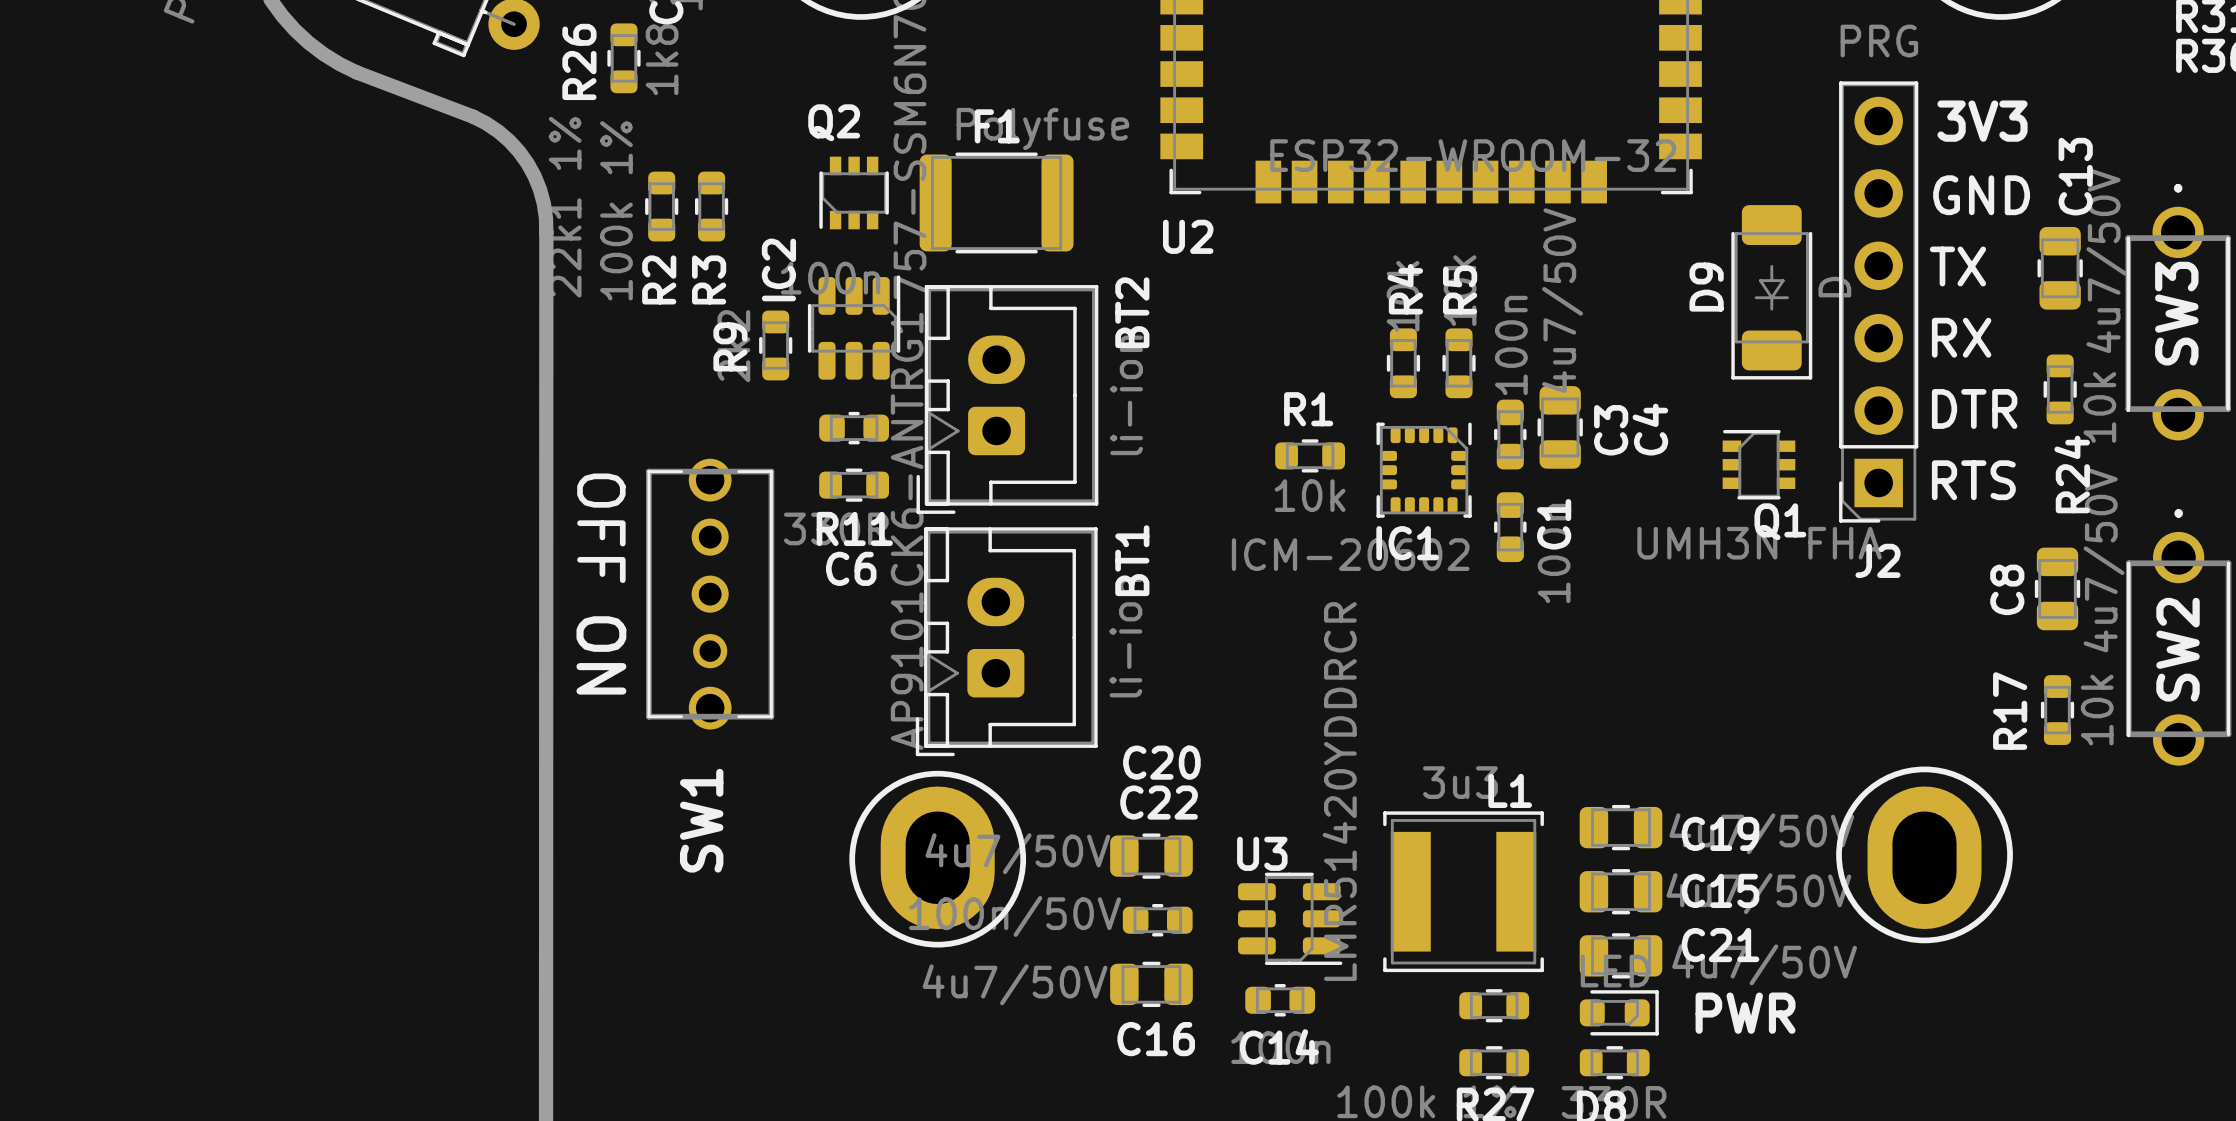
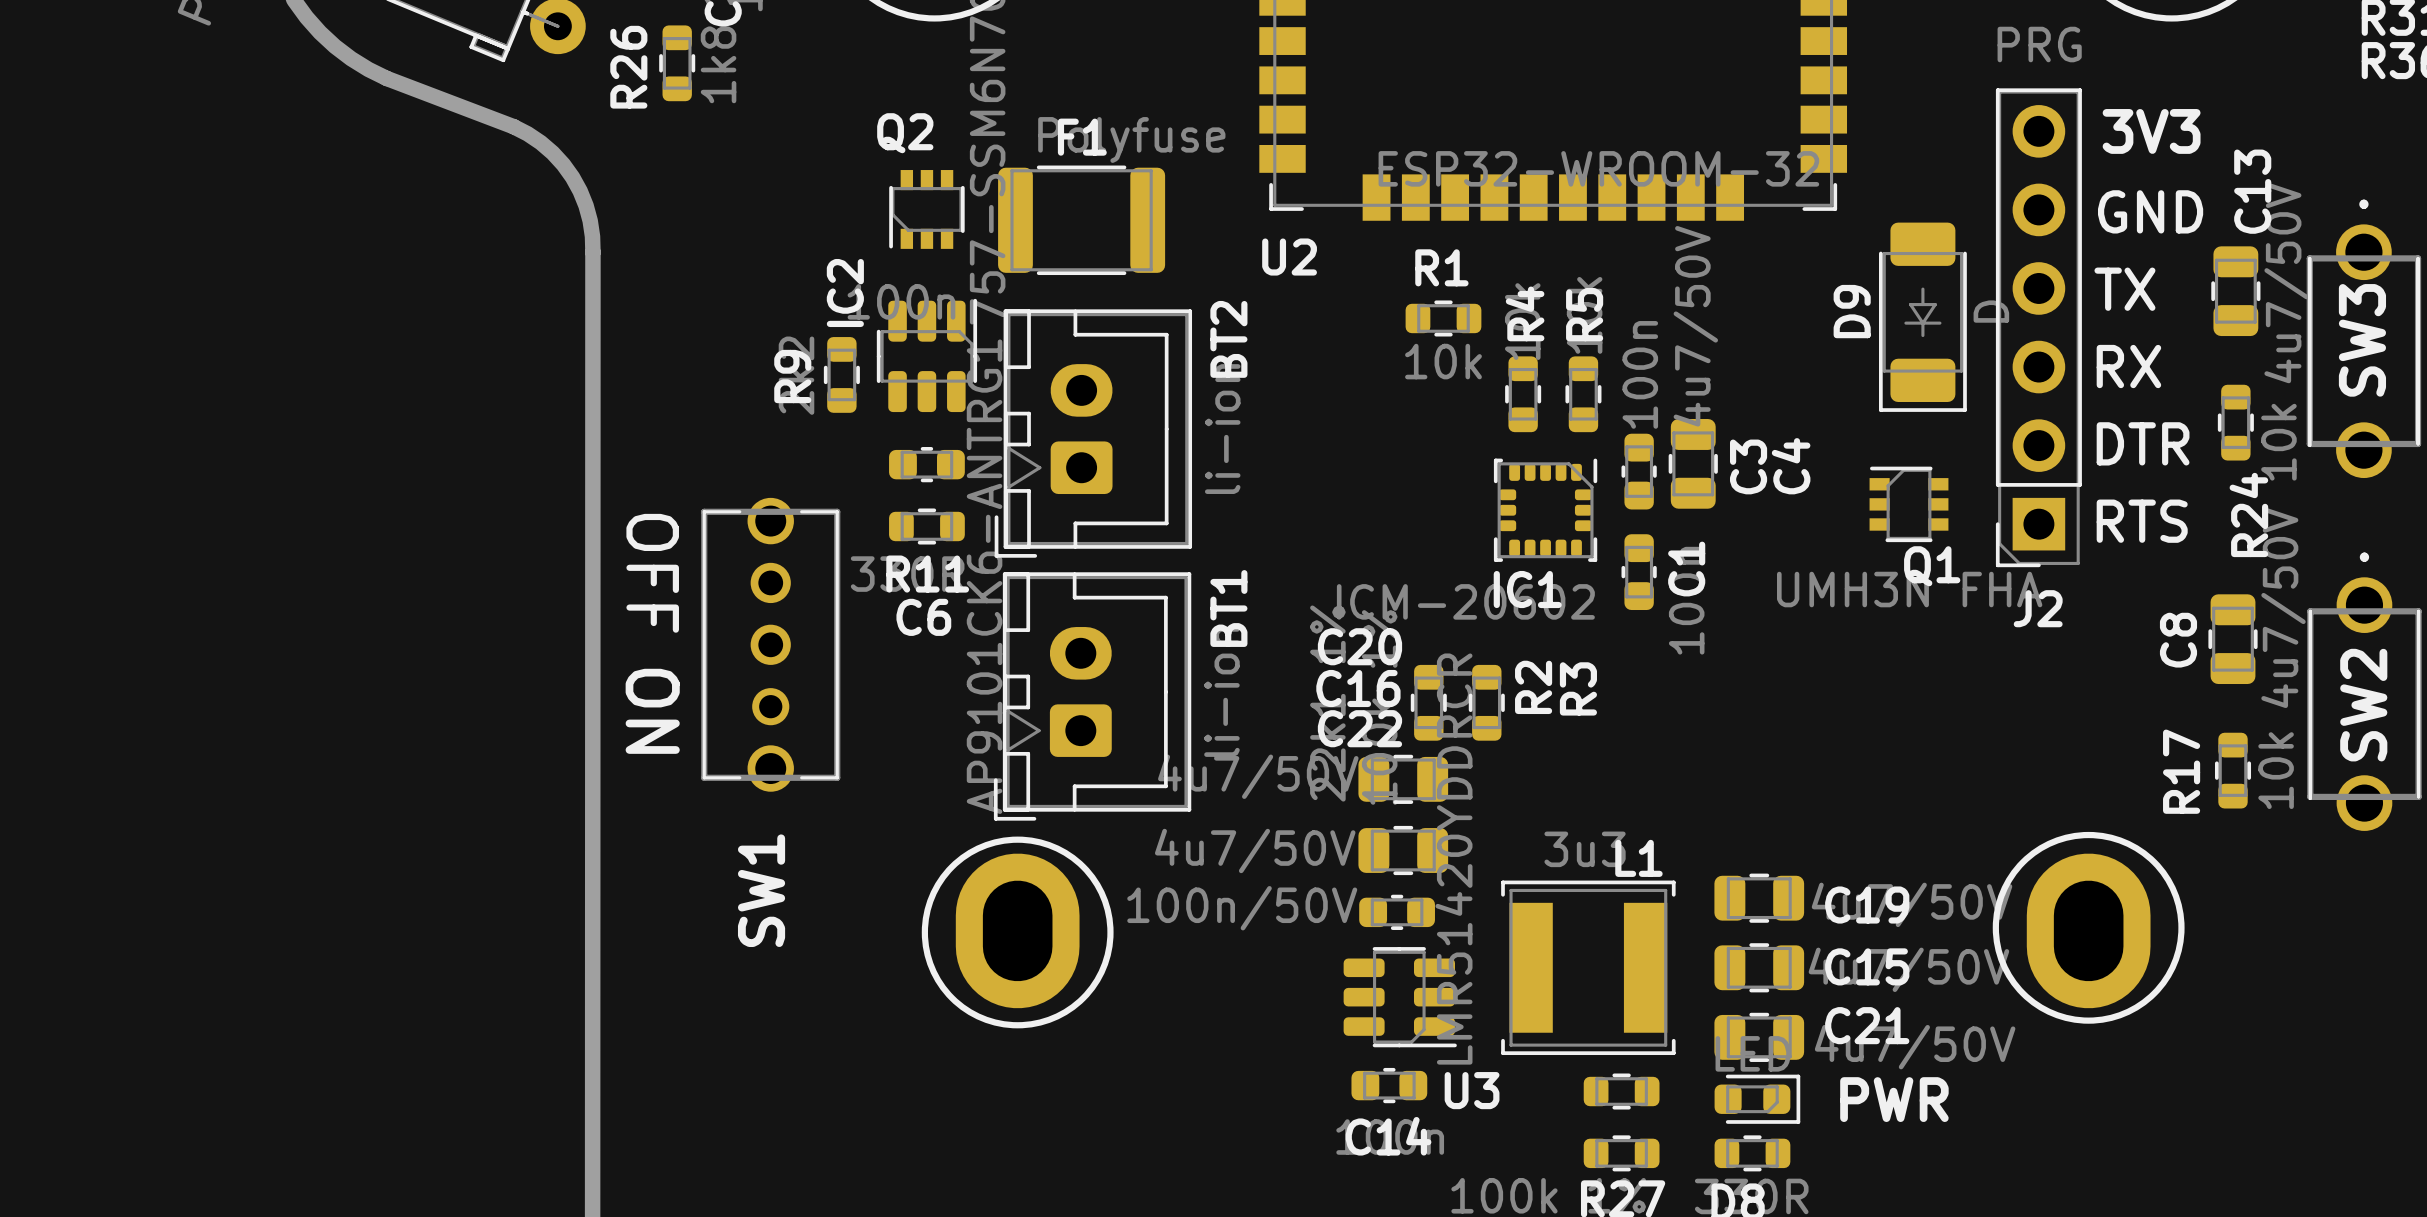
R2 position: (661, 206) -> (1428, 702)
R3 position: (711, 206) -> (1486, 702)
R2 name position: R2 (659, 279) -> R2 (1533, 687)
R3 name position: R3 (709, 279) -> R3 (1578, 688)
R1 position: (1310, 455) -> (1443, 318)
C20 name position: C20 (1161, 762) -> C20 (1359, 646)
C22 name position: C22 (1159, 802) -> C22 (1359, 728)
U3 name position: U3 (1262, 853) -> U3 (1472, 1090)
C20 position: (1151, 856) -> (1403, 779)
C22 position: (1157, 920) -> (1397, 912)
C16 position: (1151, 984) -> (1403, 850)
C16 name position: C16 (1156, 1039) -> C16 (1358, 688)

